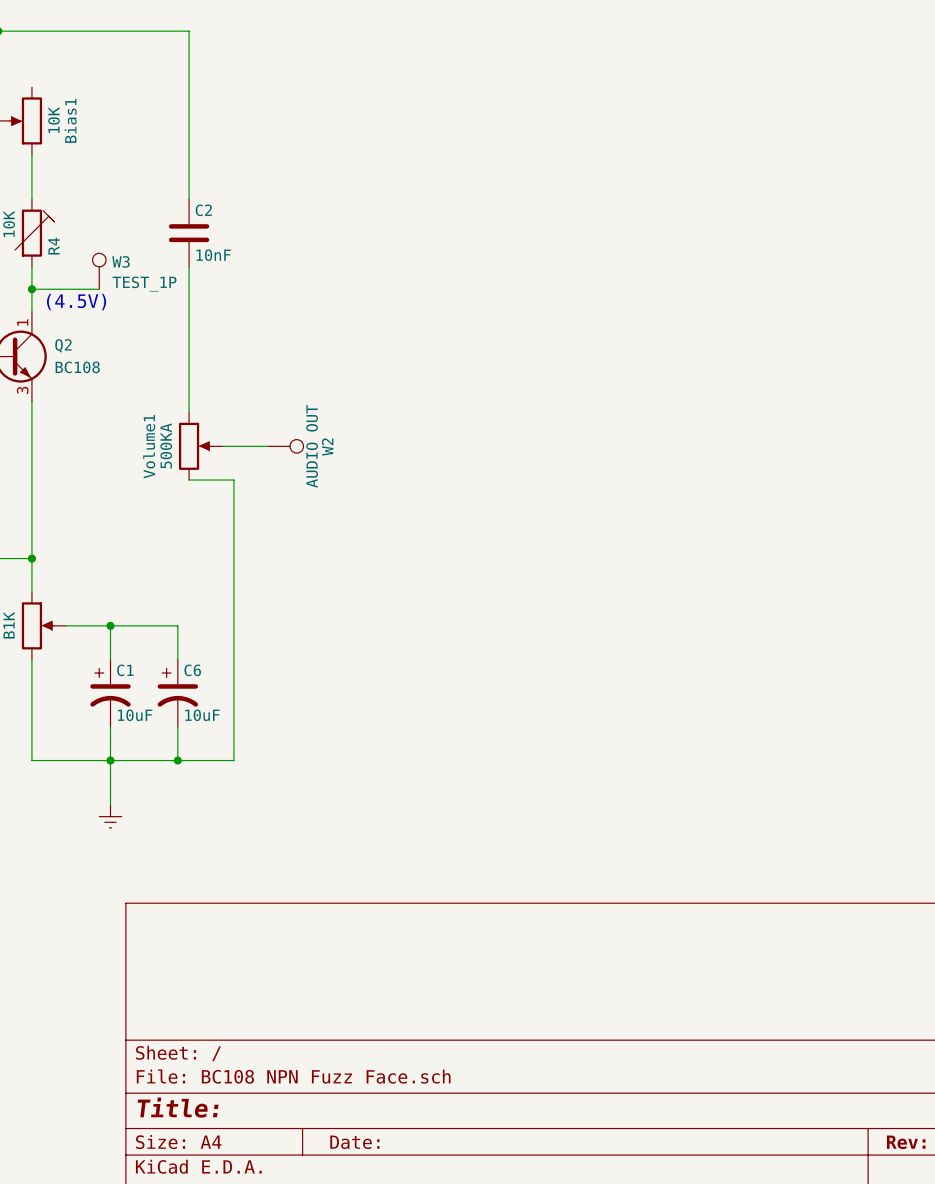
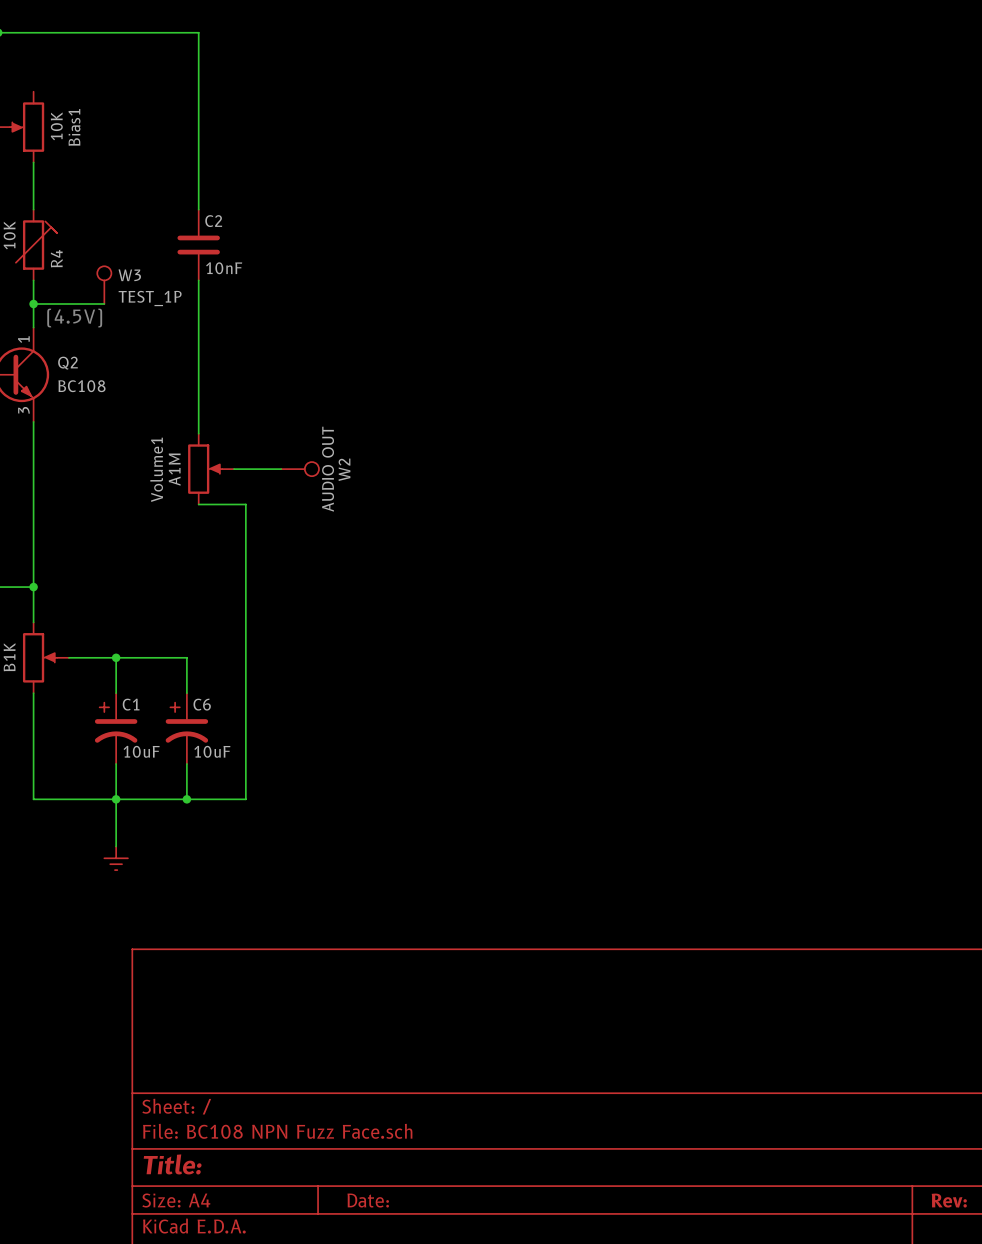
Volume1 value: 500KA (166, 445) -> A1M (174, 469)

